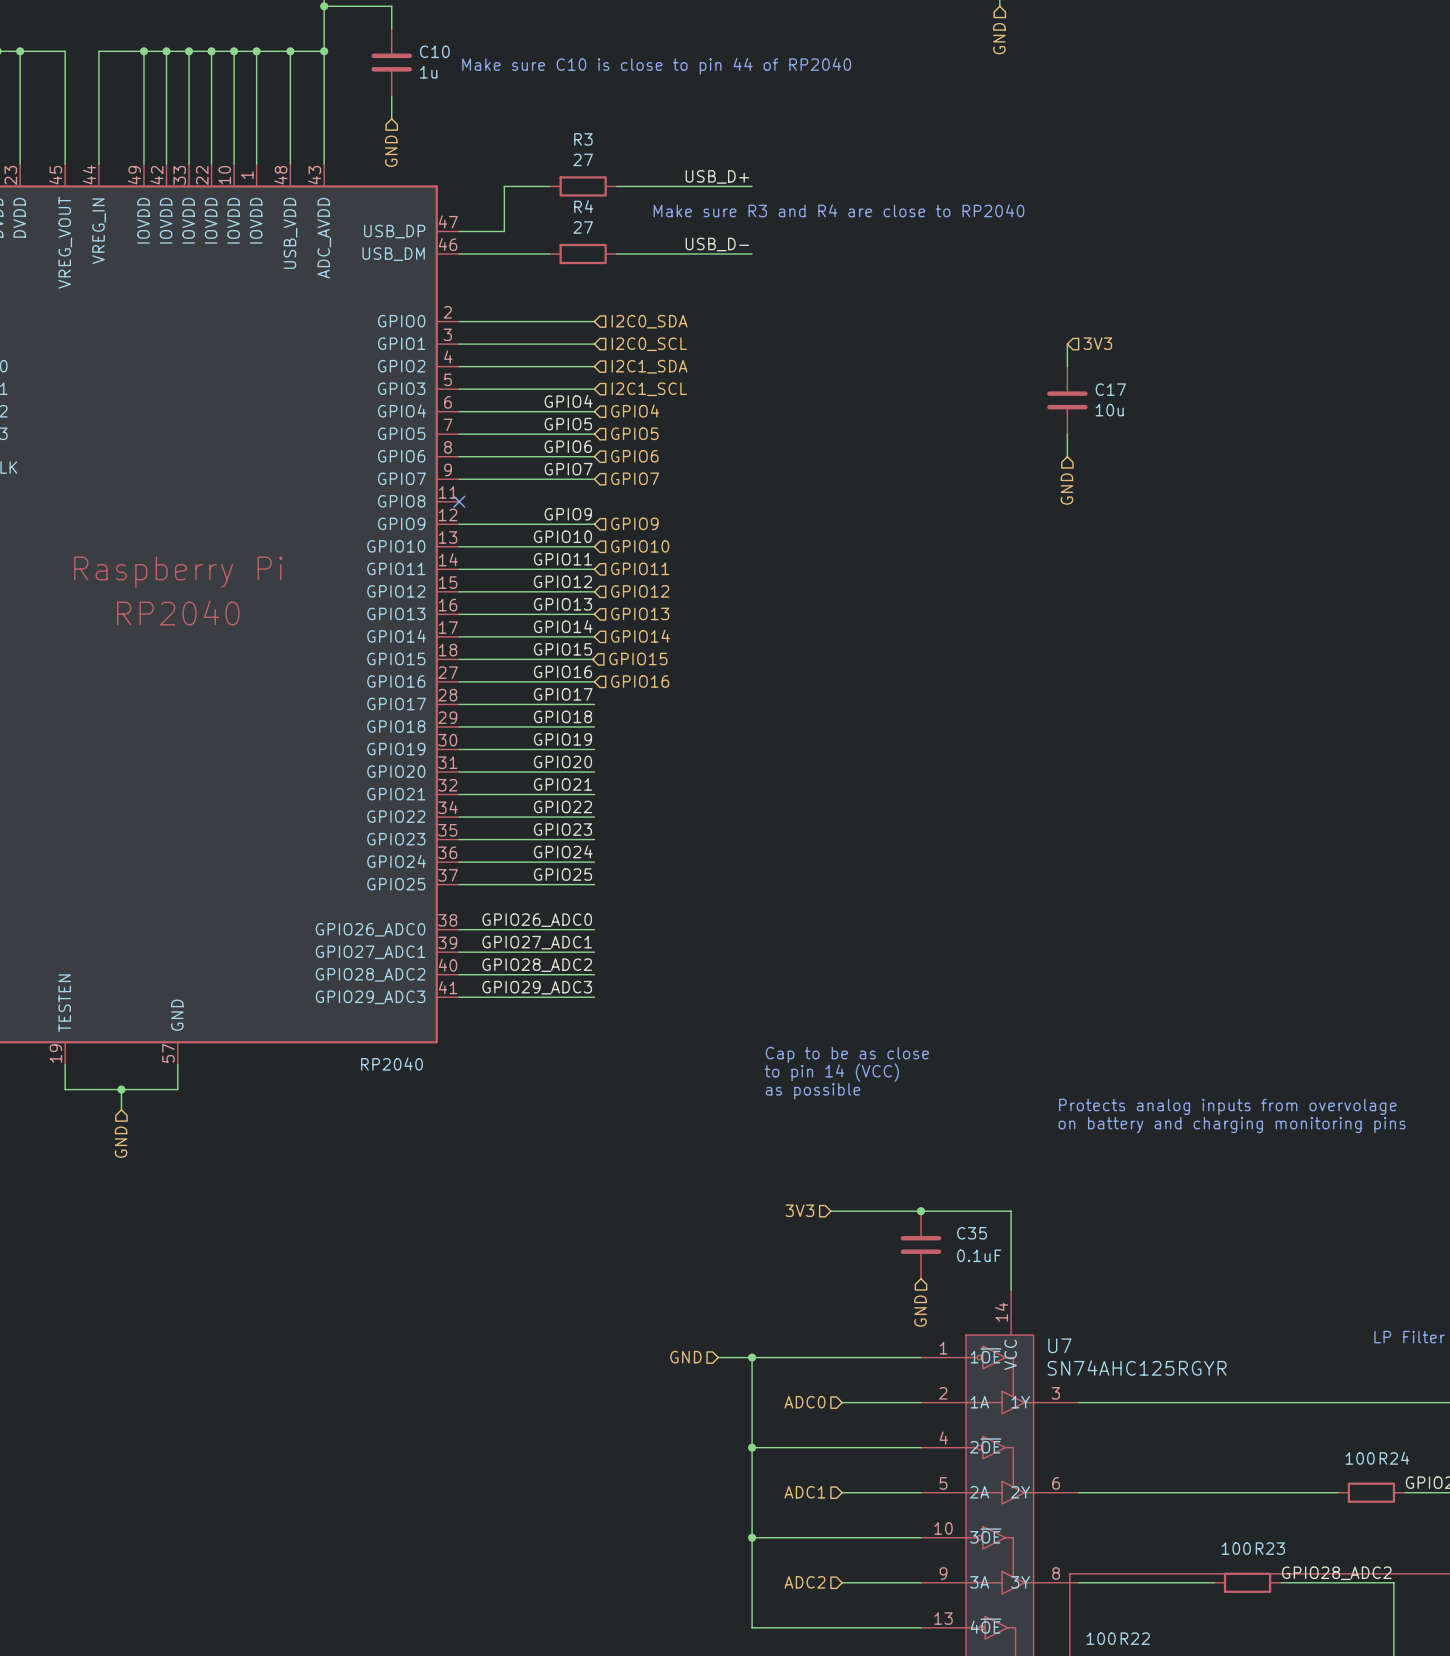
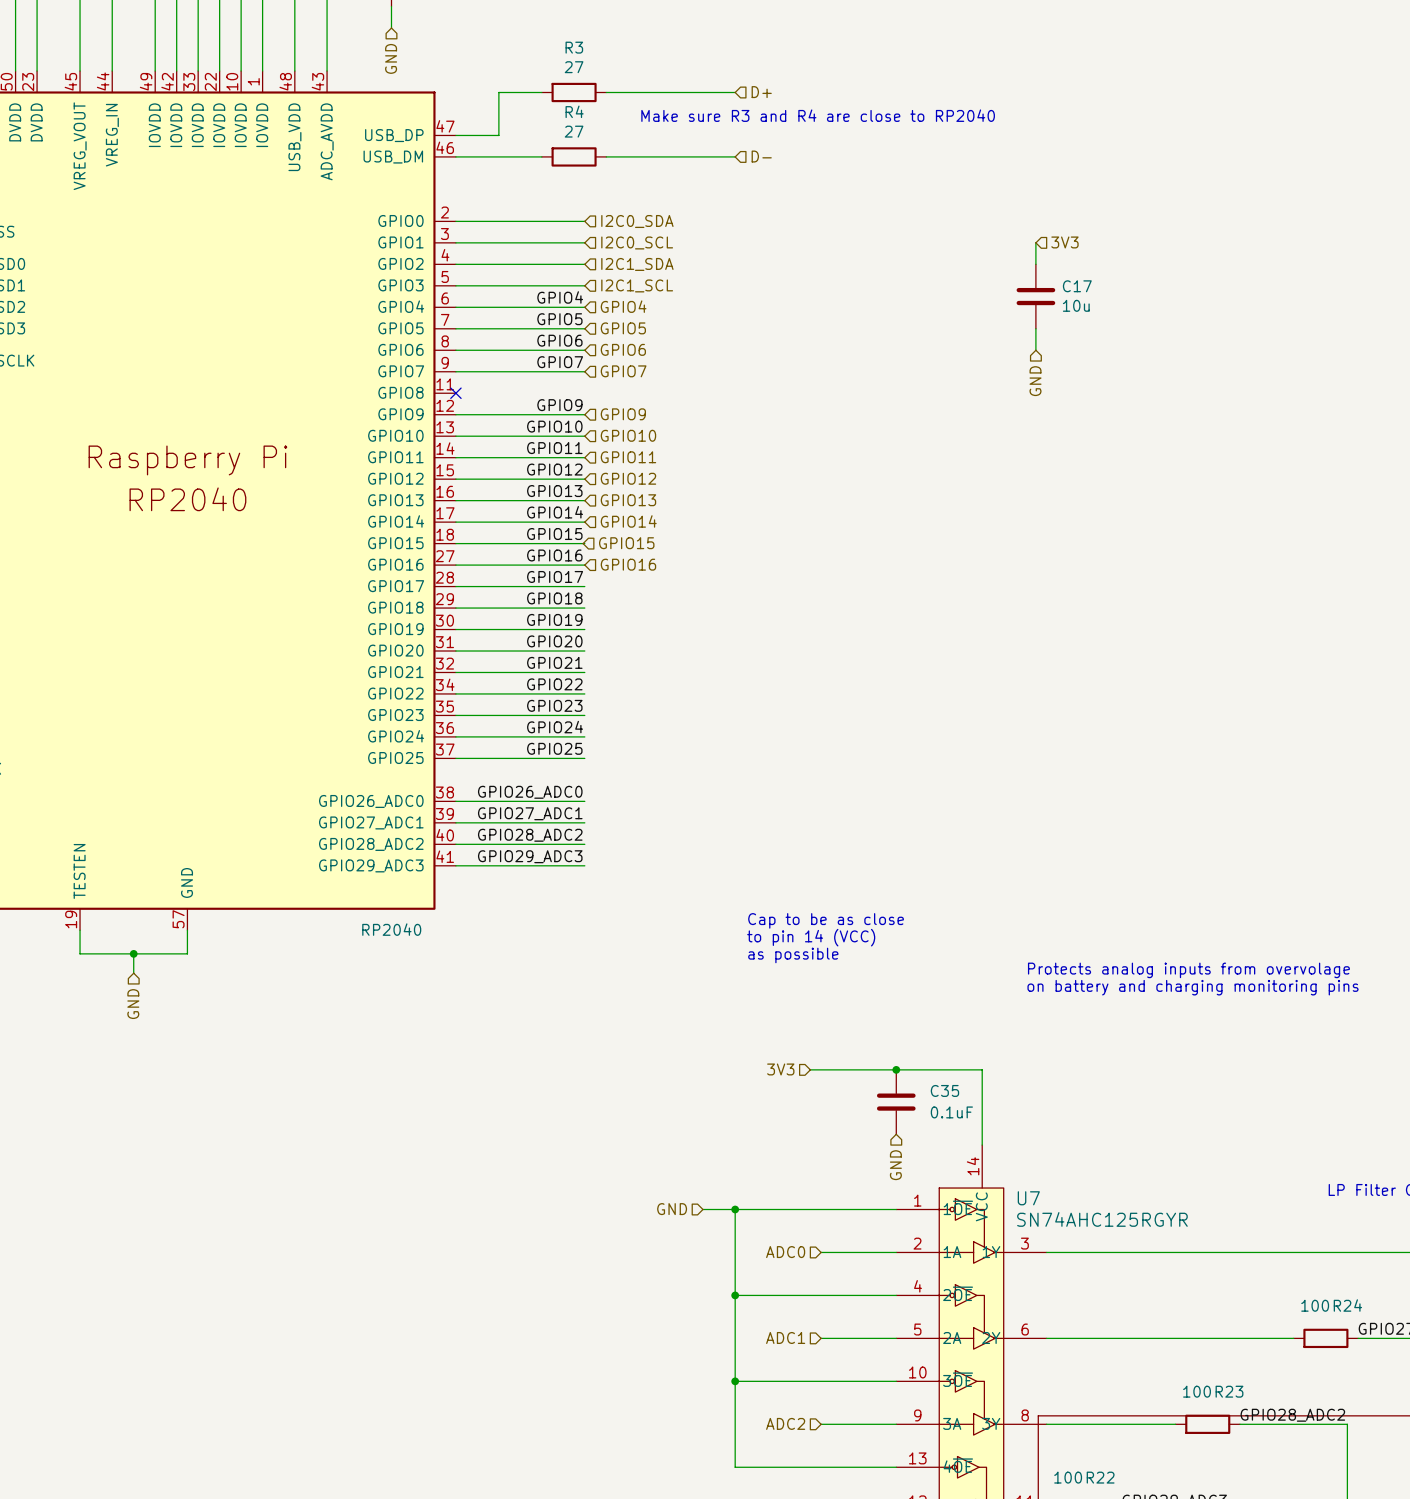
label: USB_D+ (717, 176) -> none
hierarchical label: none -> D+ (761, 92)
label: USB_D- (717, 244) -> none
hierarchical label: none -> D- (761, 156)

